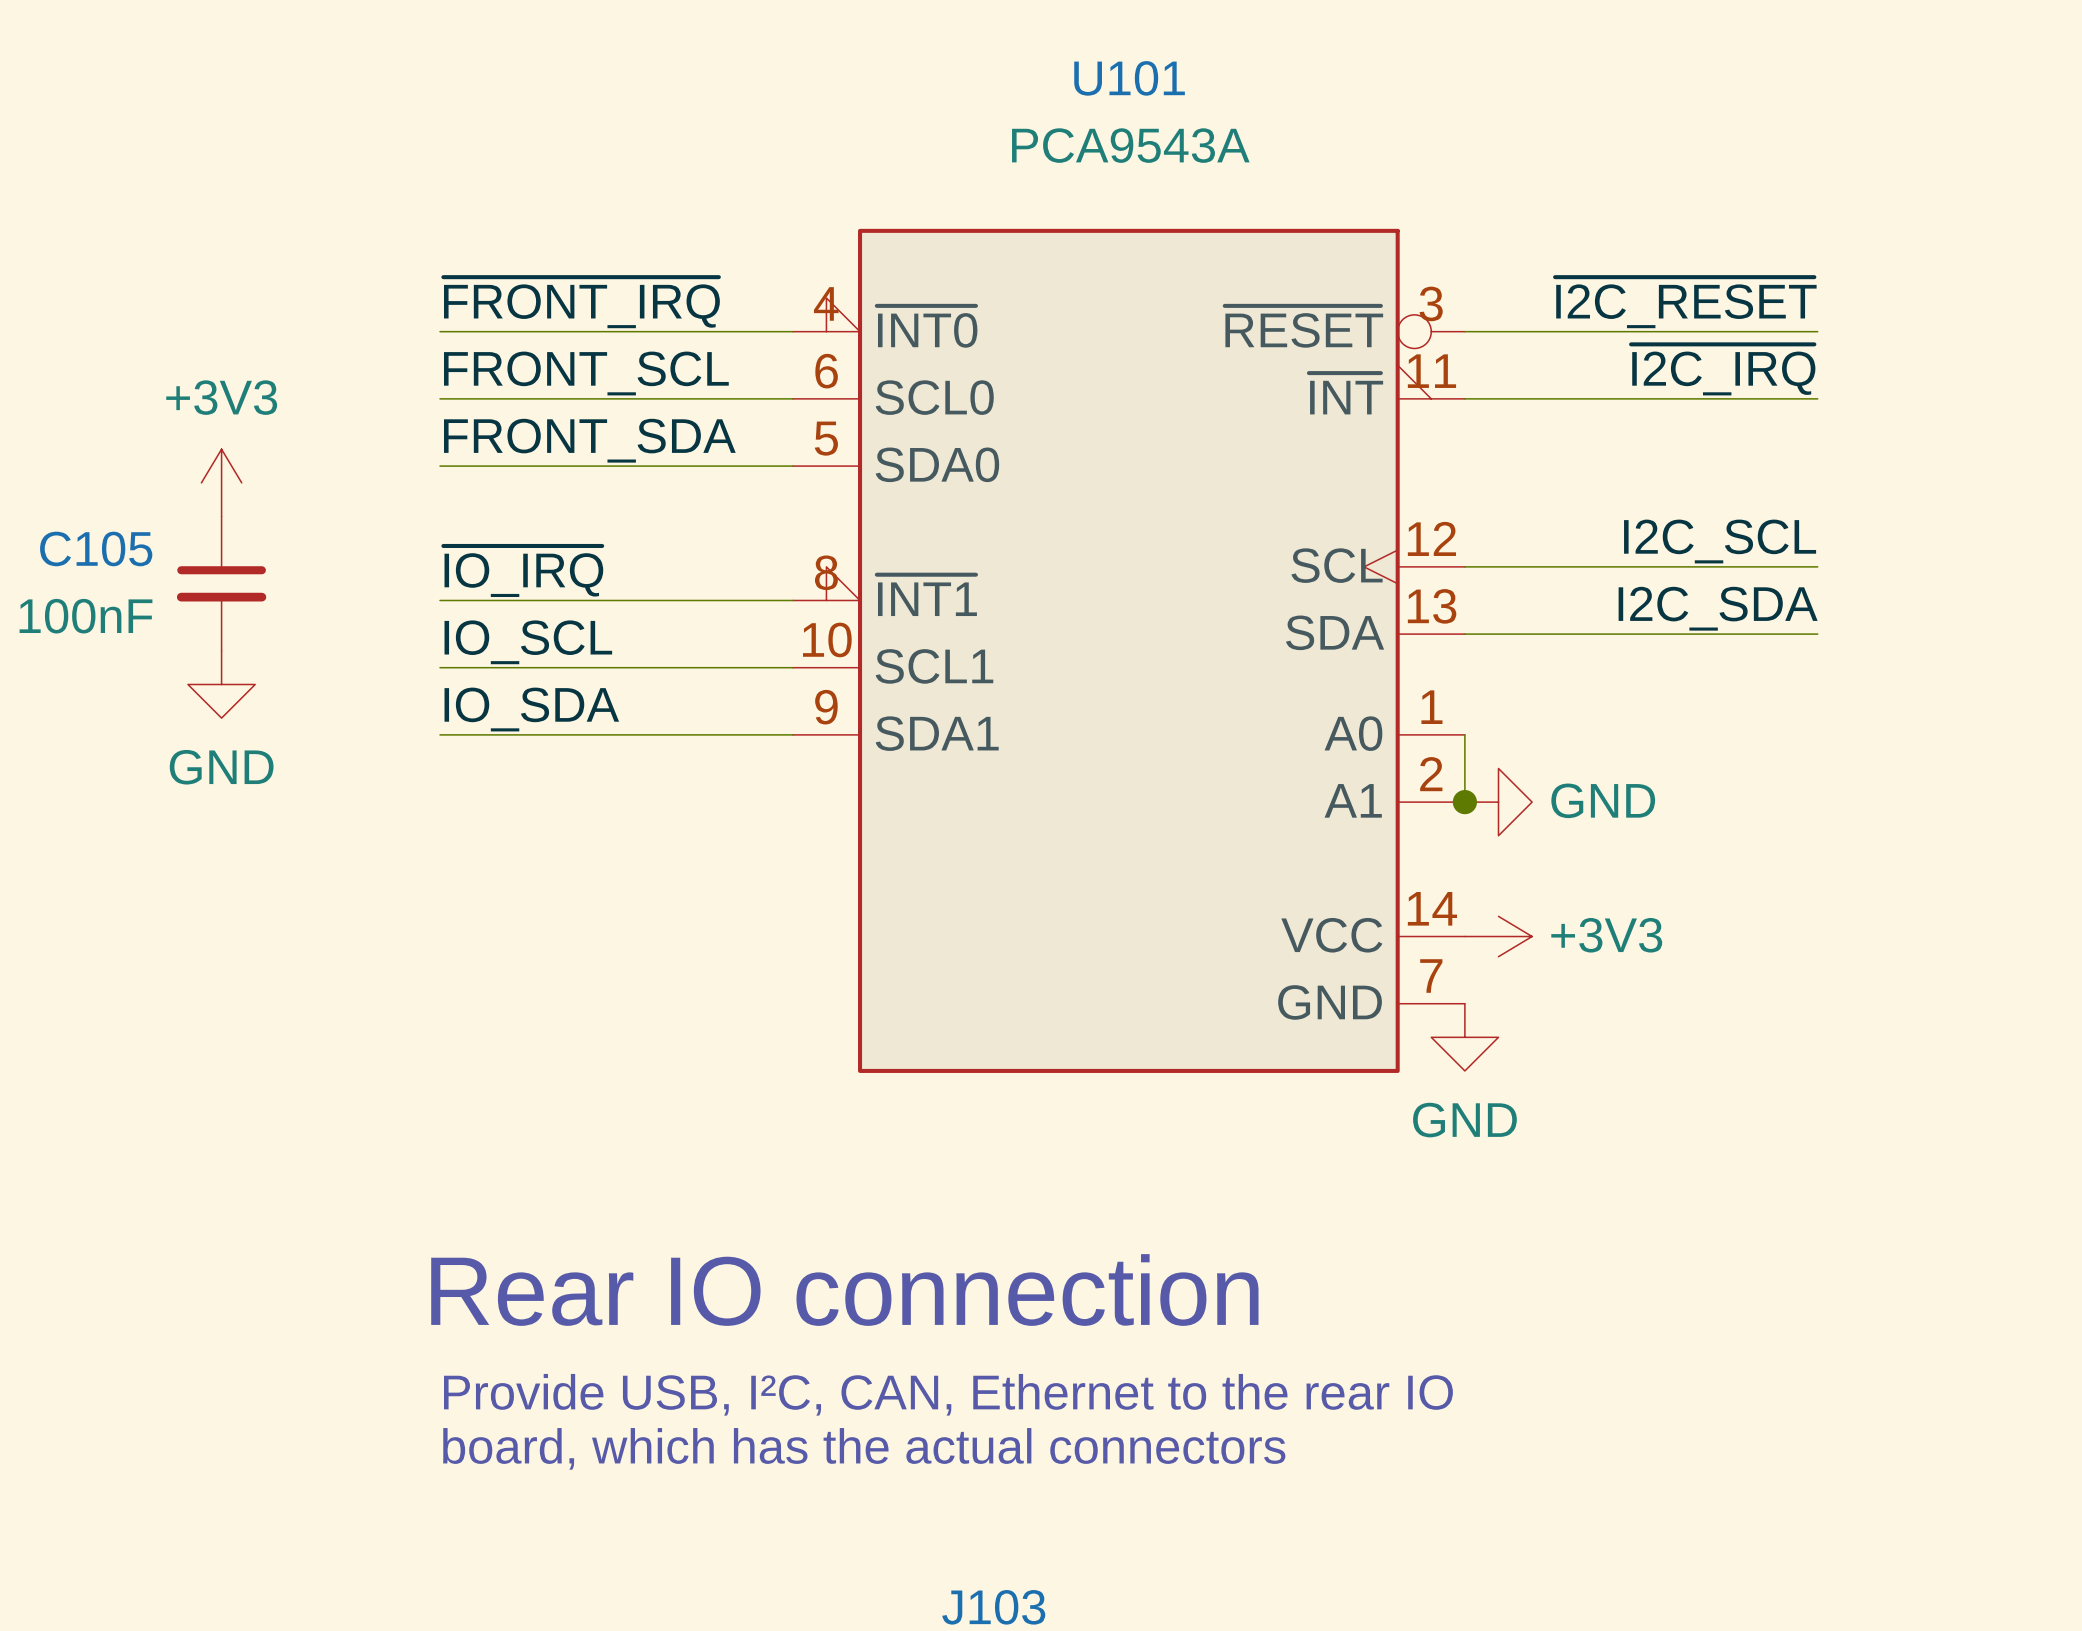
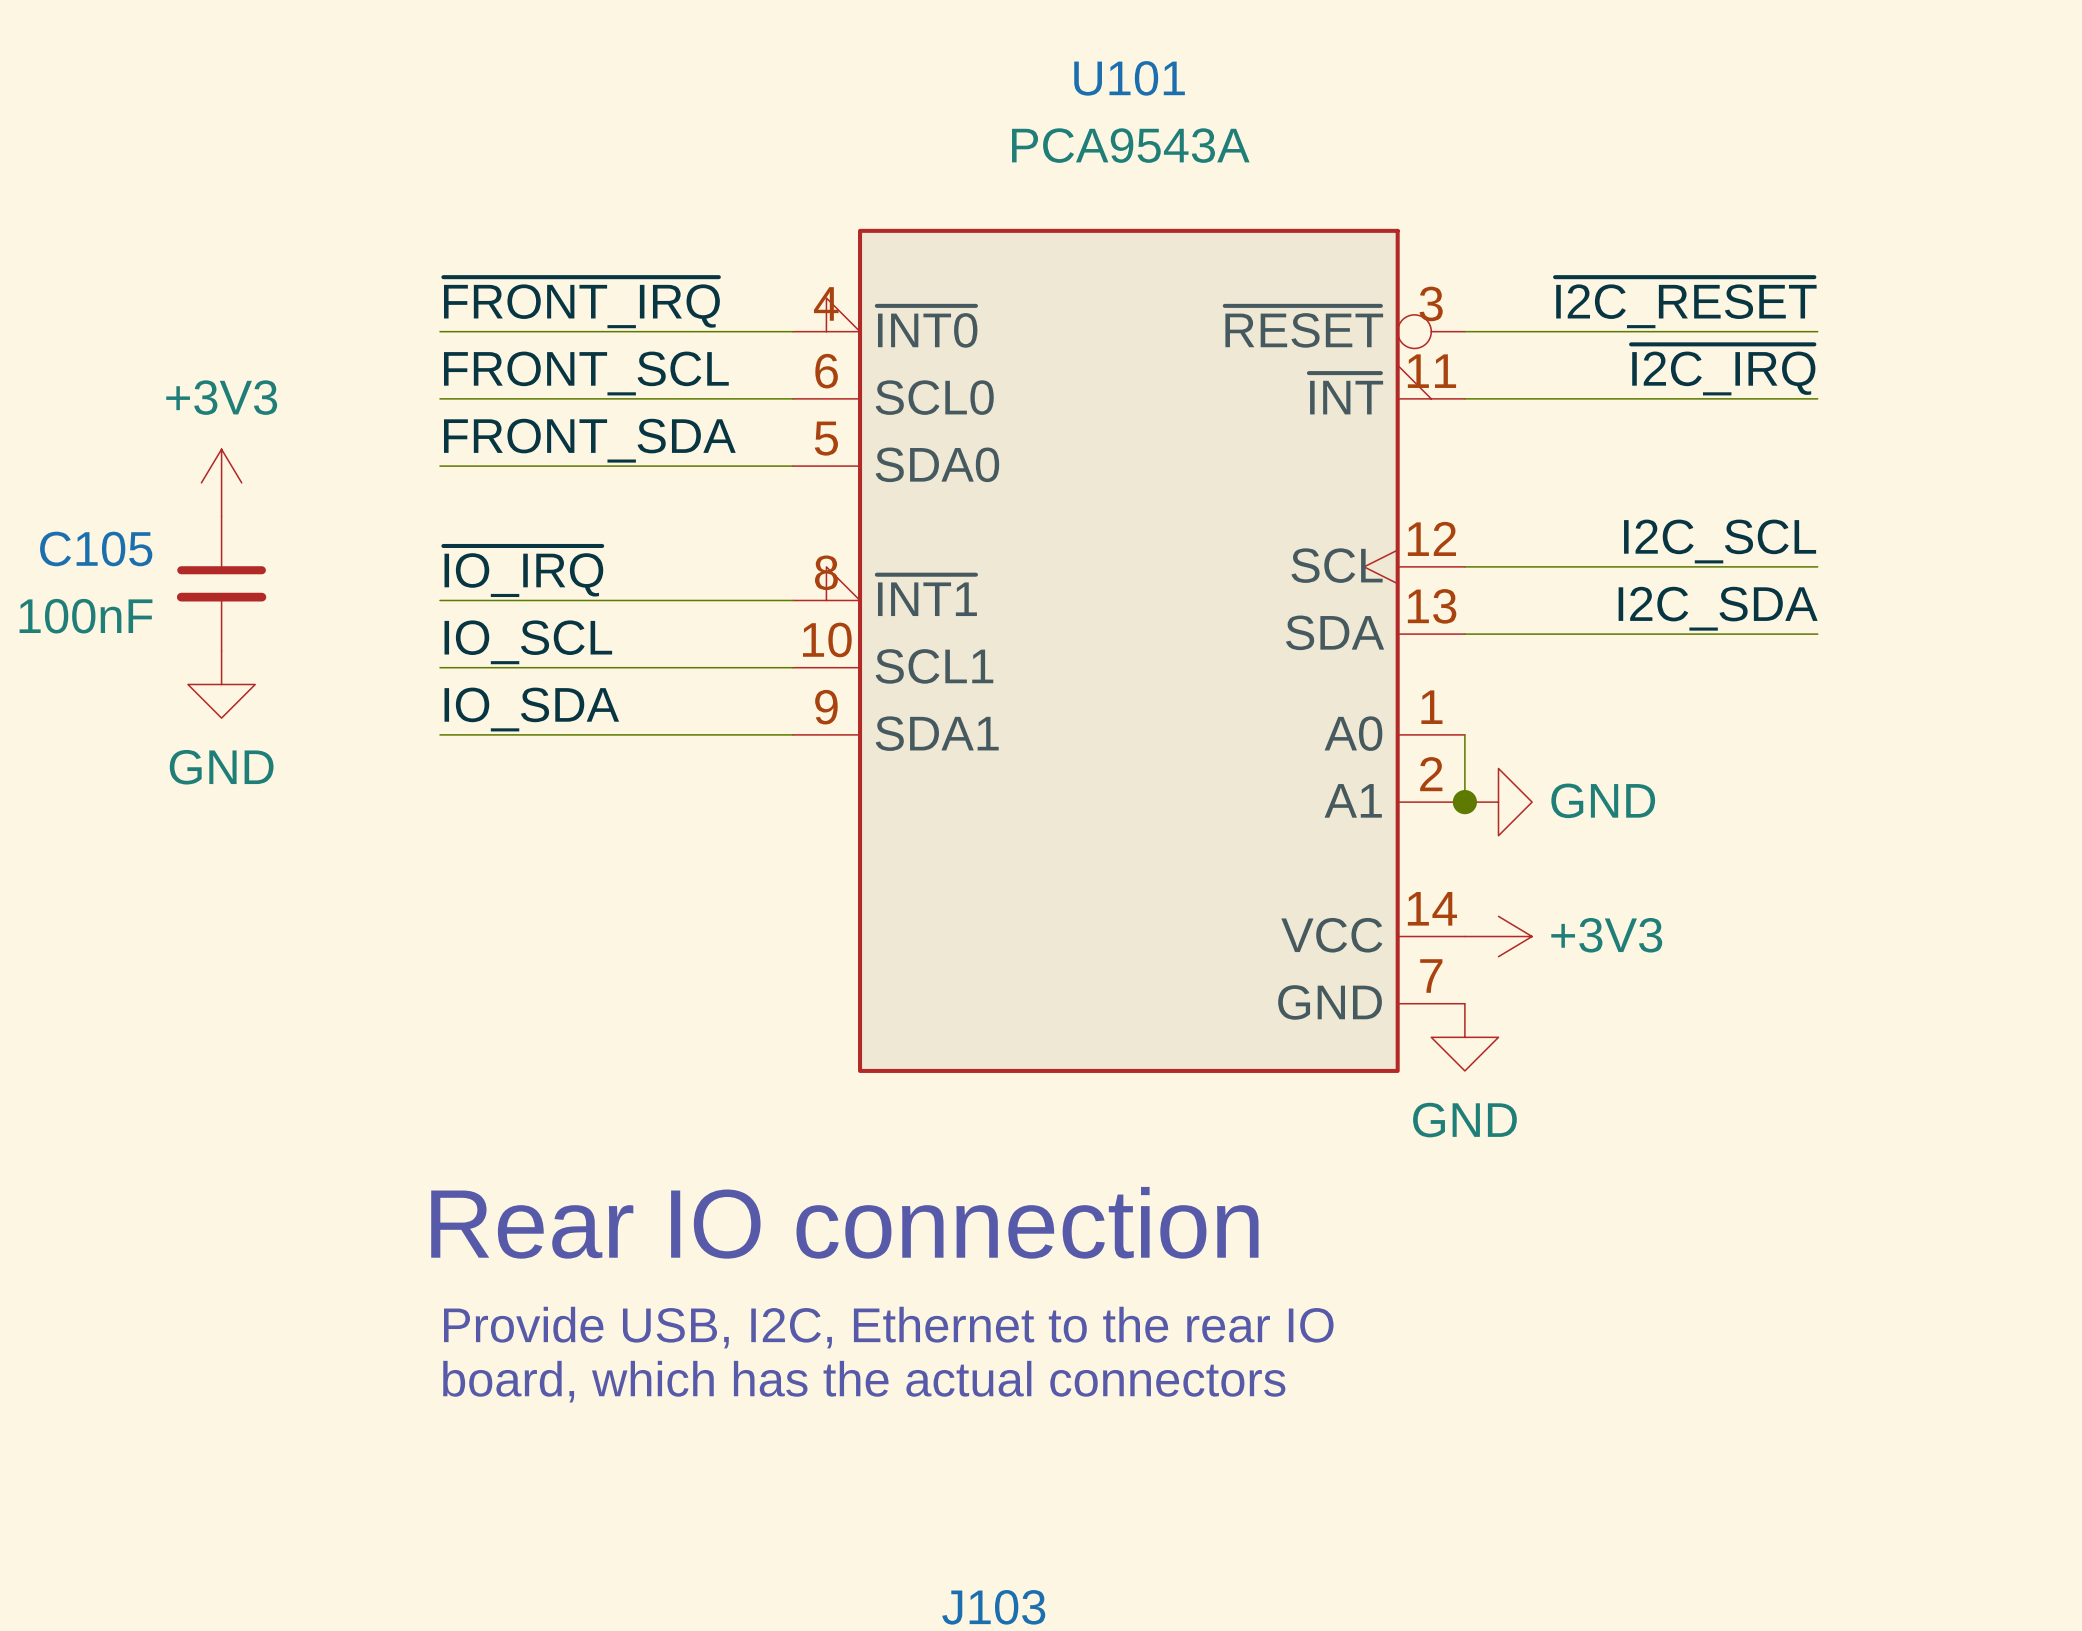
text: none -> Rear IO connection (844, 1222)
text: Rear IO connection (844, 1290) -> Provide USB, I2C, Ethernet to the rear IO (888, 1327)
text: Provide USB, I²C, CAN, Ethernet to the rear IO (948, 1394) -> board, which has the actual connectors (864, 1381)
text: board, which has the actual connectors (864, 1448) -> none

